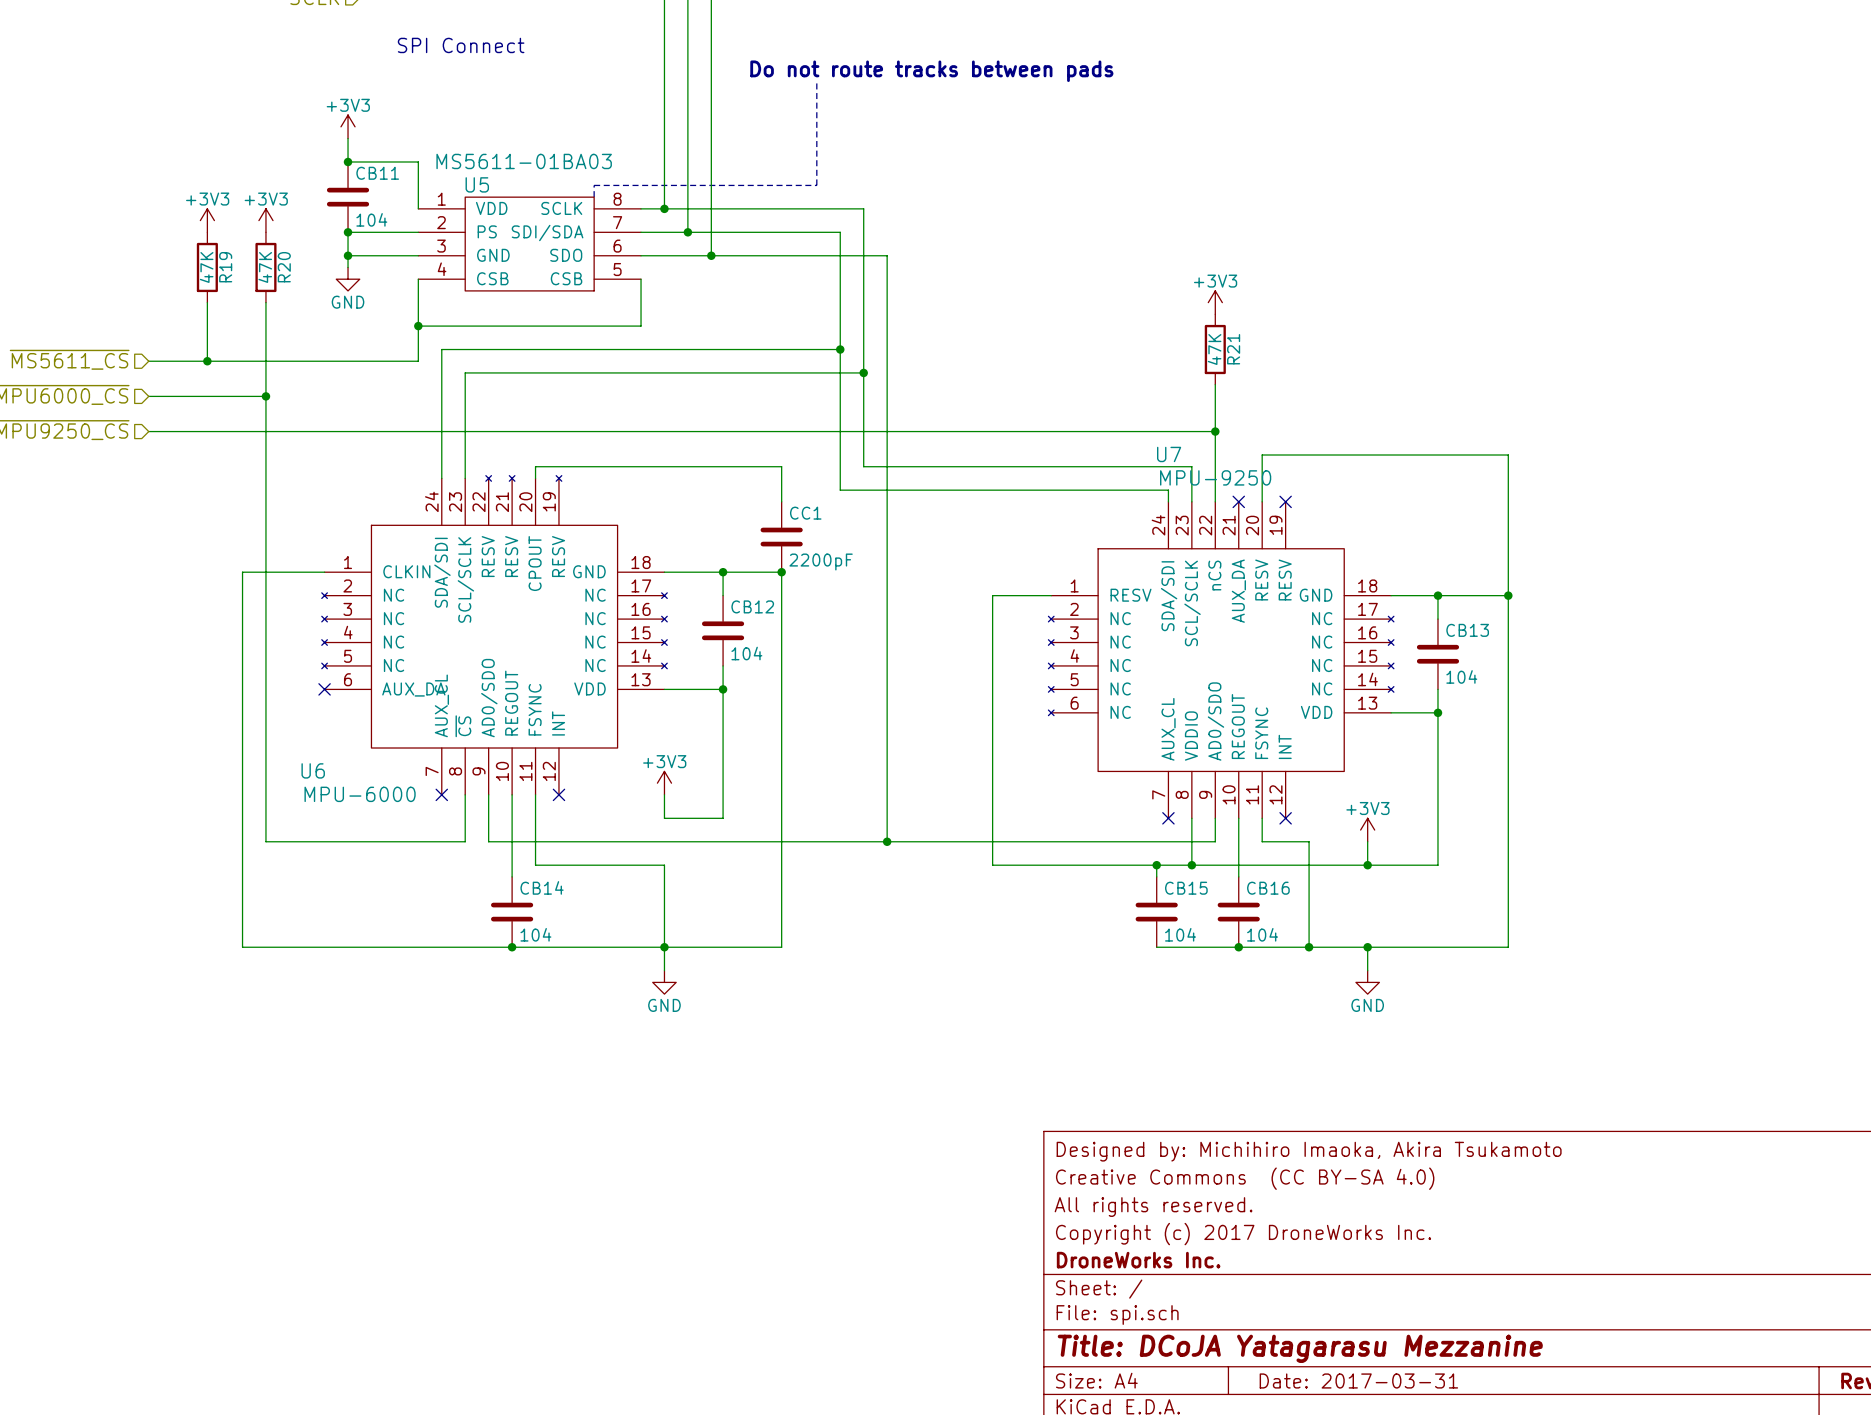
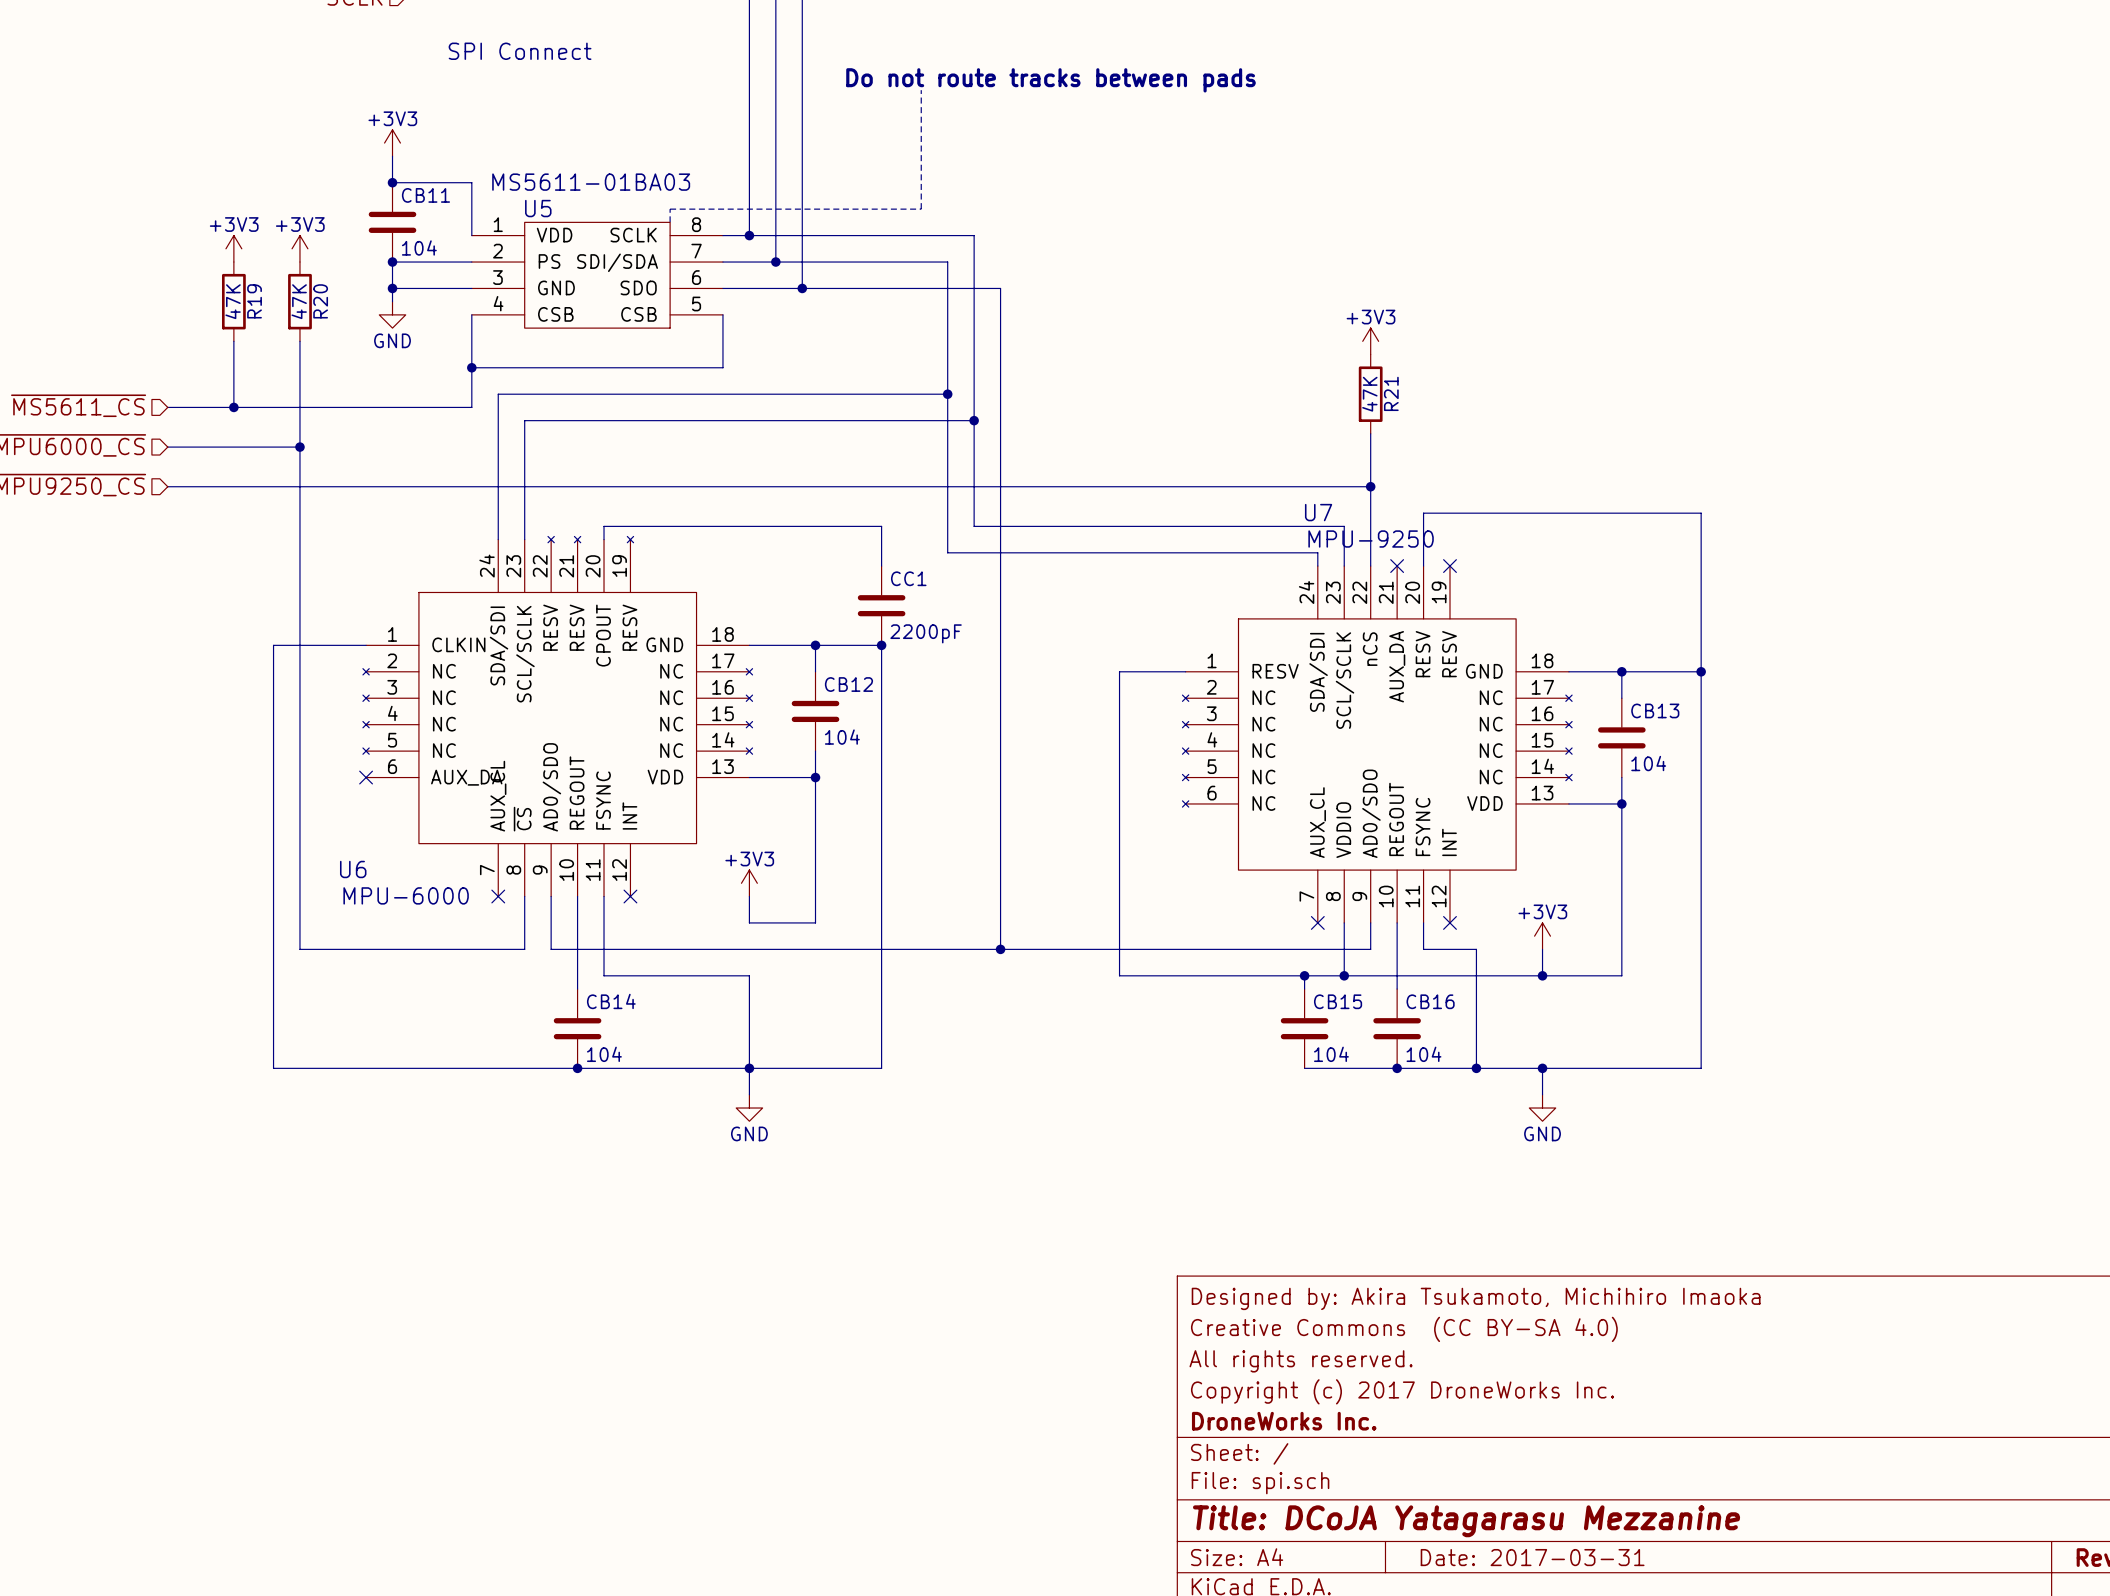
title block: Designed by: Michihiro Imaoka, Akira Tsukamoto (1309, 1151) -> Designed by: Akira Tsukamoto, Michihiro Imaoka (1476, 1298)

